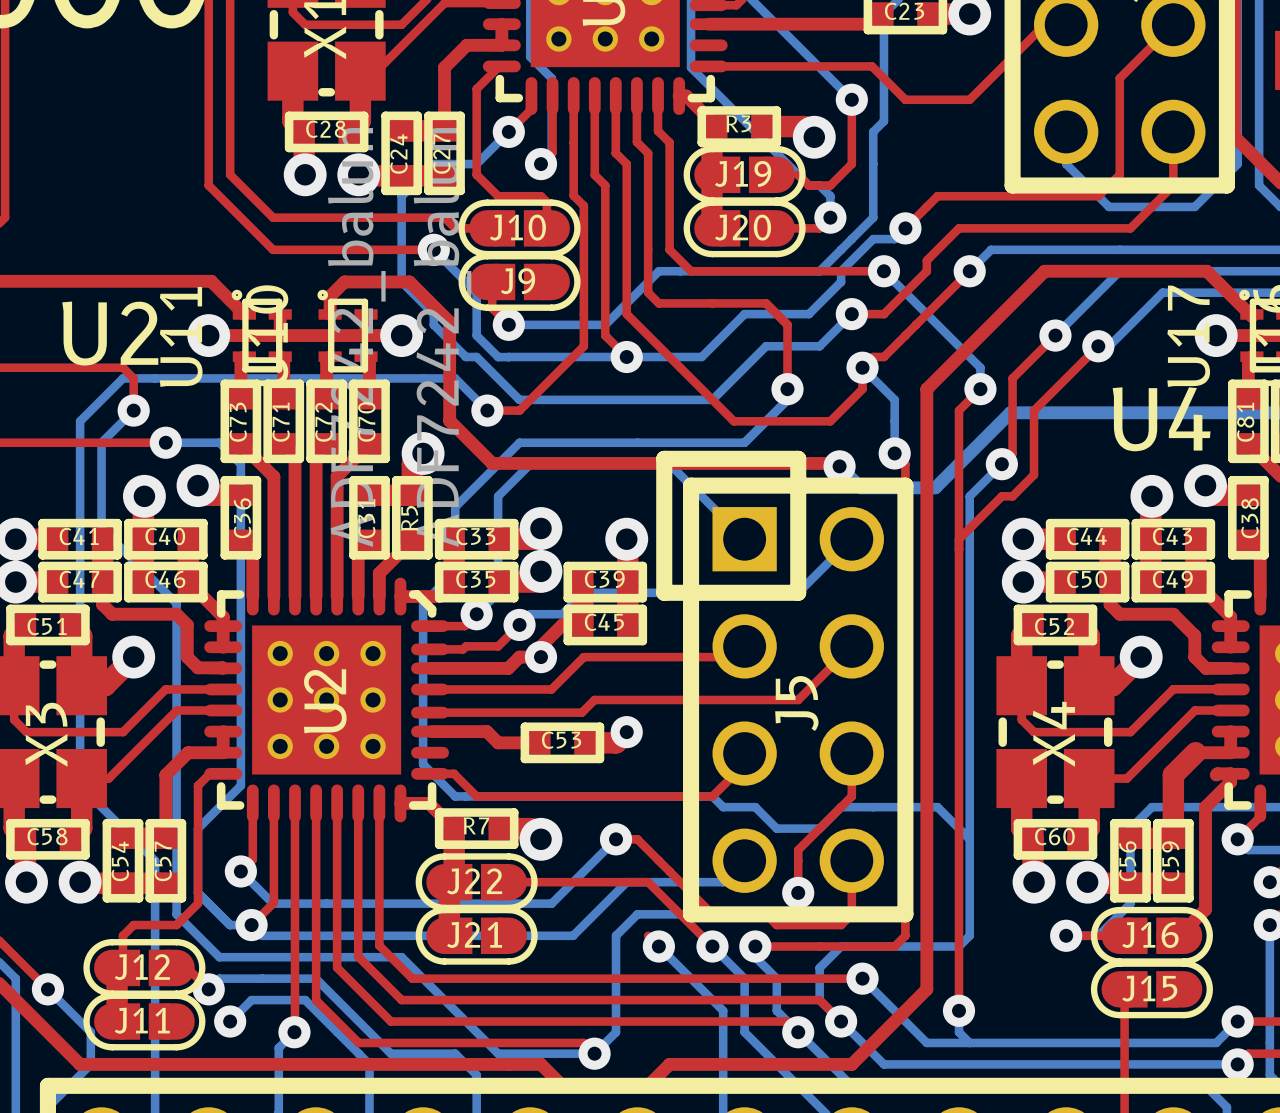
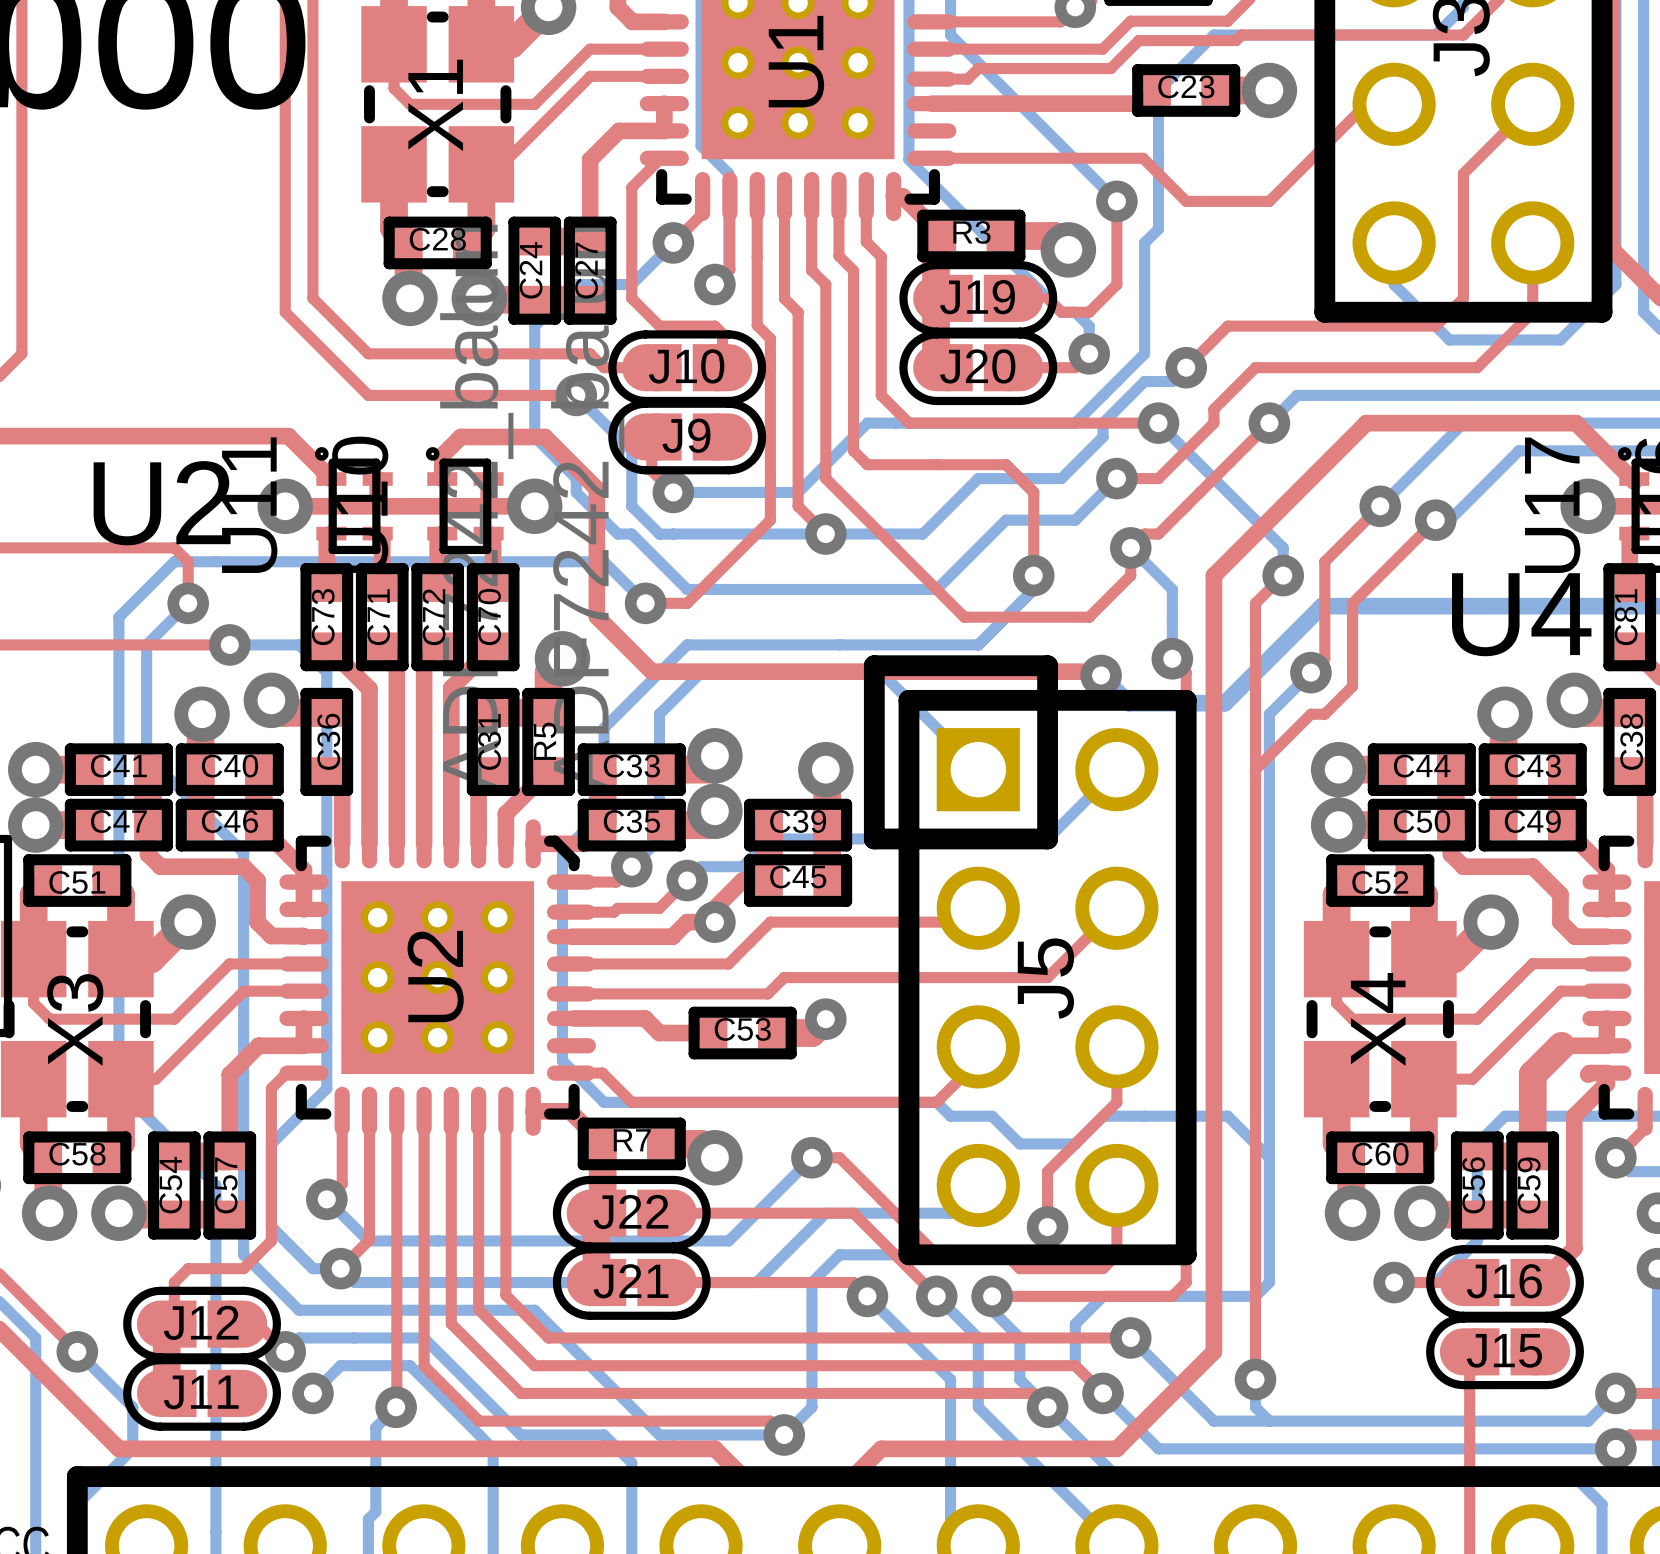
top track: none -> (596, 1282) (853, 1282)

